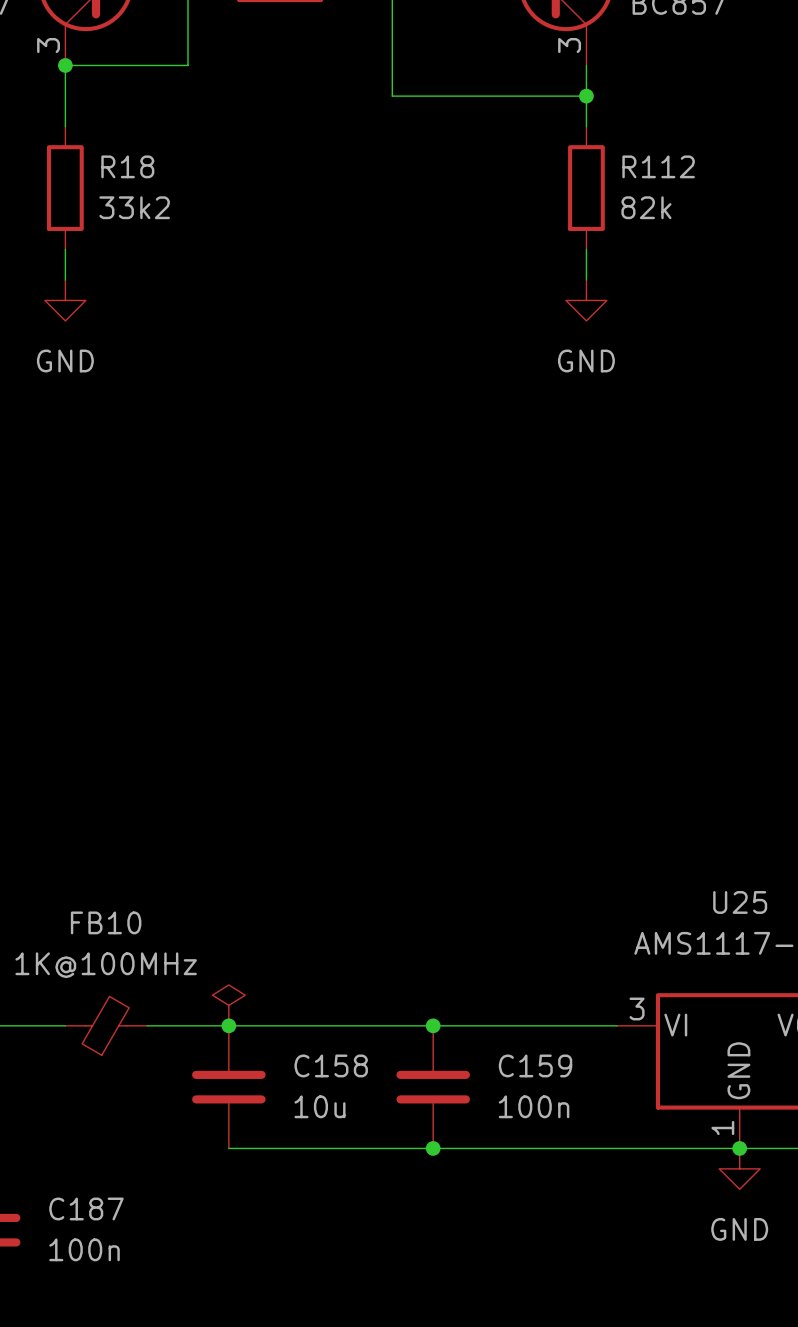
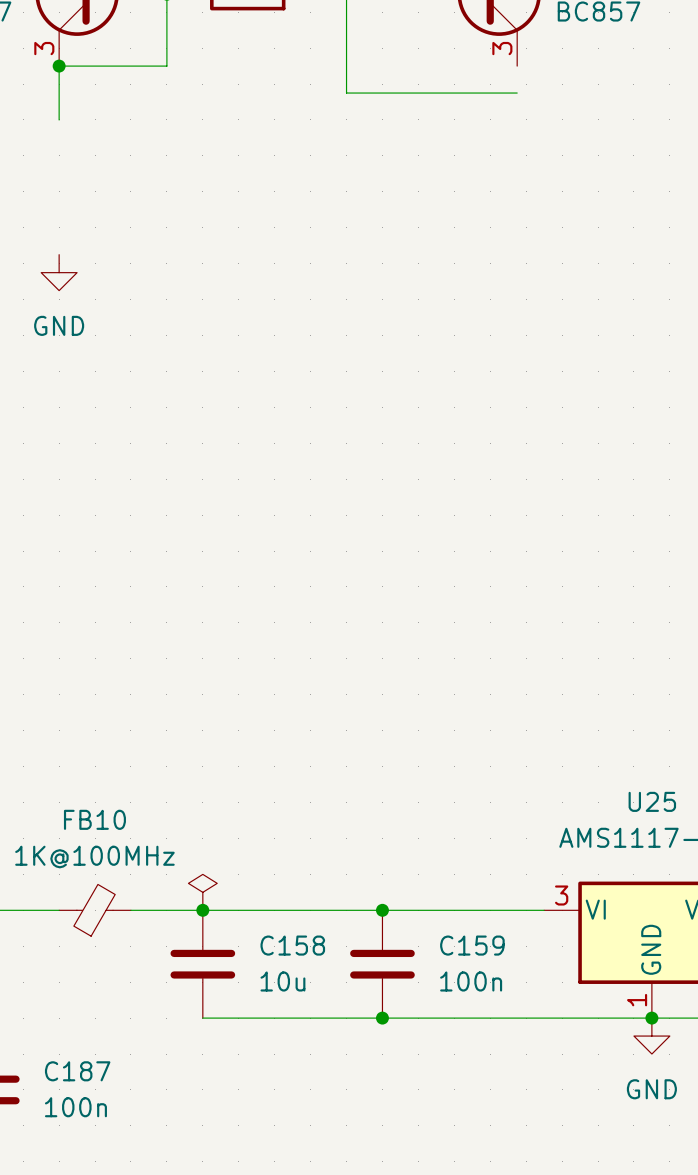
wire: (586, 65) (586, 126) -> none
junction: (586, 96) -> none
R18: 33k2 (65, 188) -> none
R112: 82k (586, 188) -> none
wire: (65, 249) (65, 280) -> none
wire: (586, 249) (586, 280) -> none
power symbol: GND (586, 300) -> none

